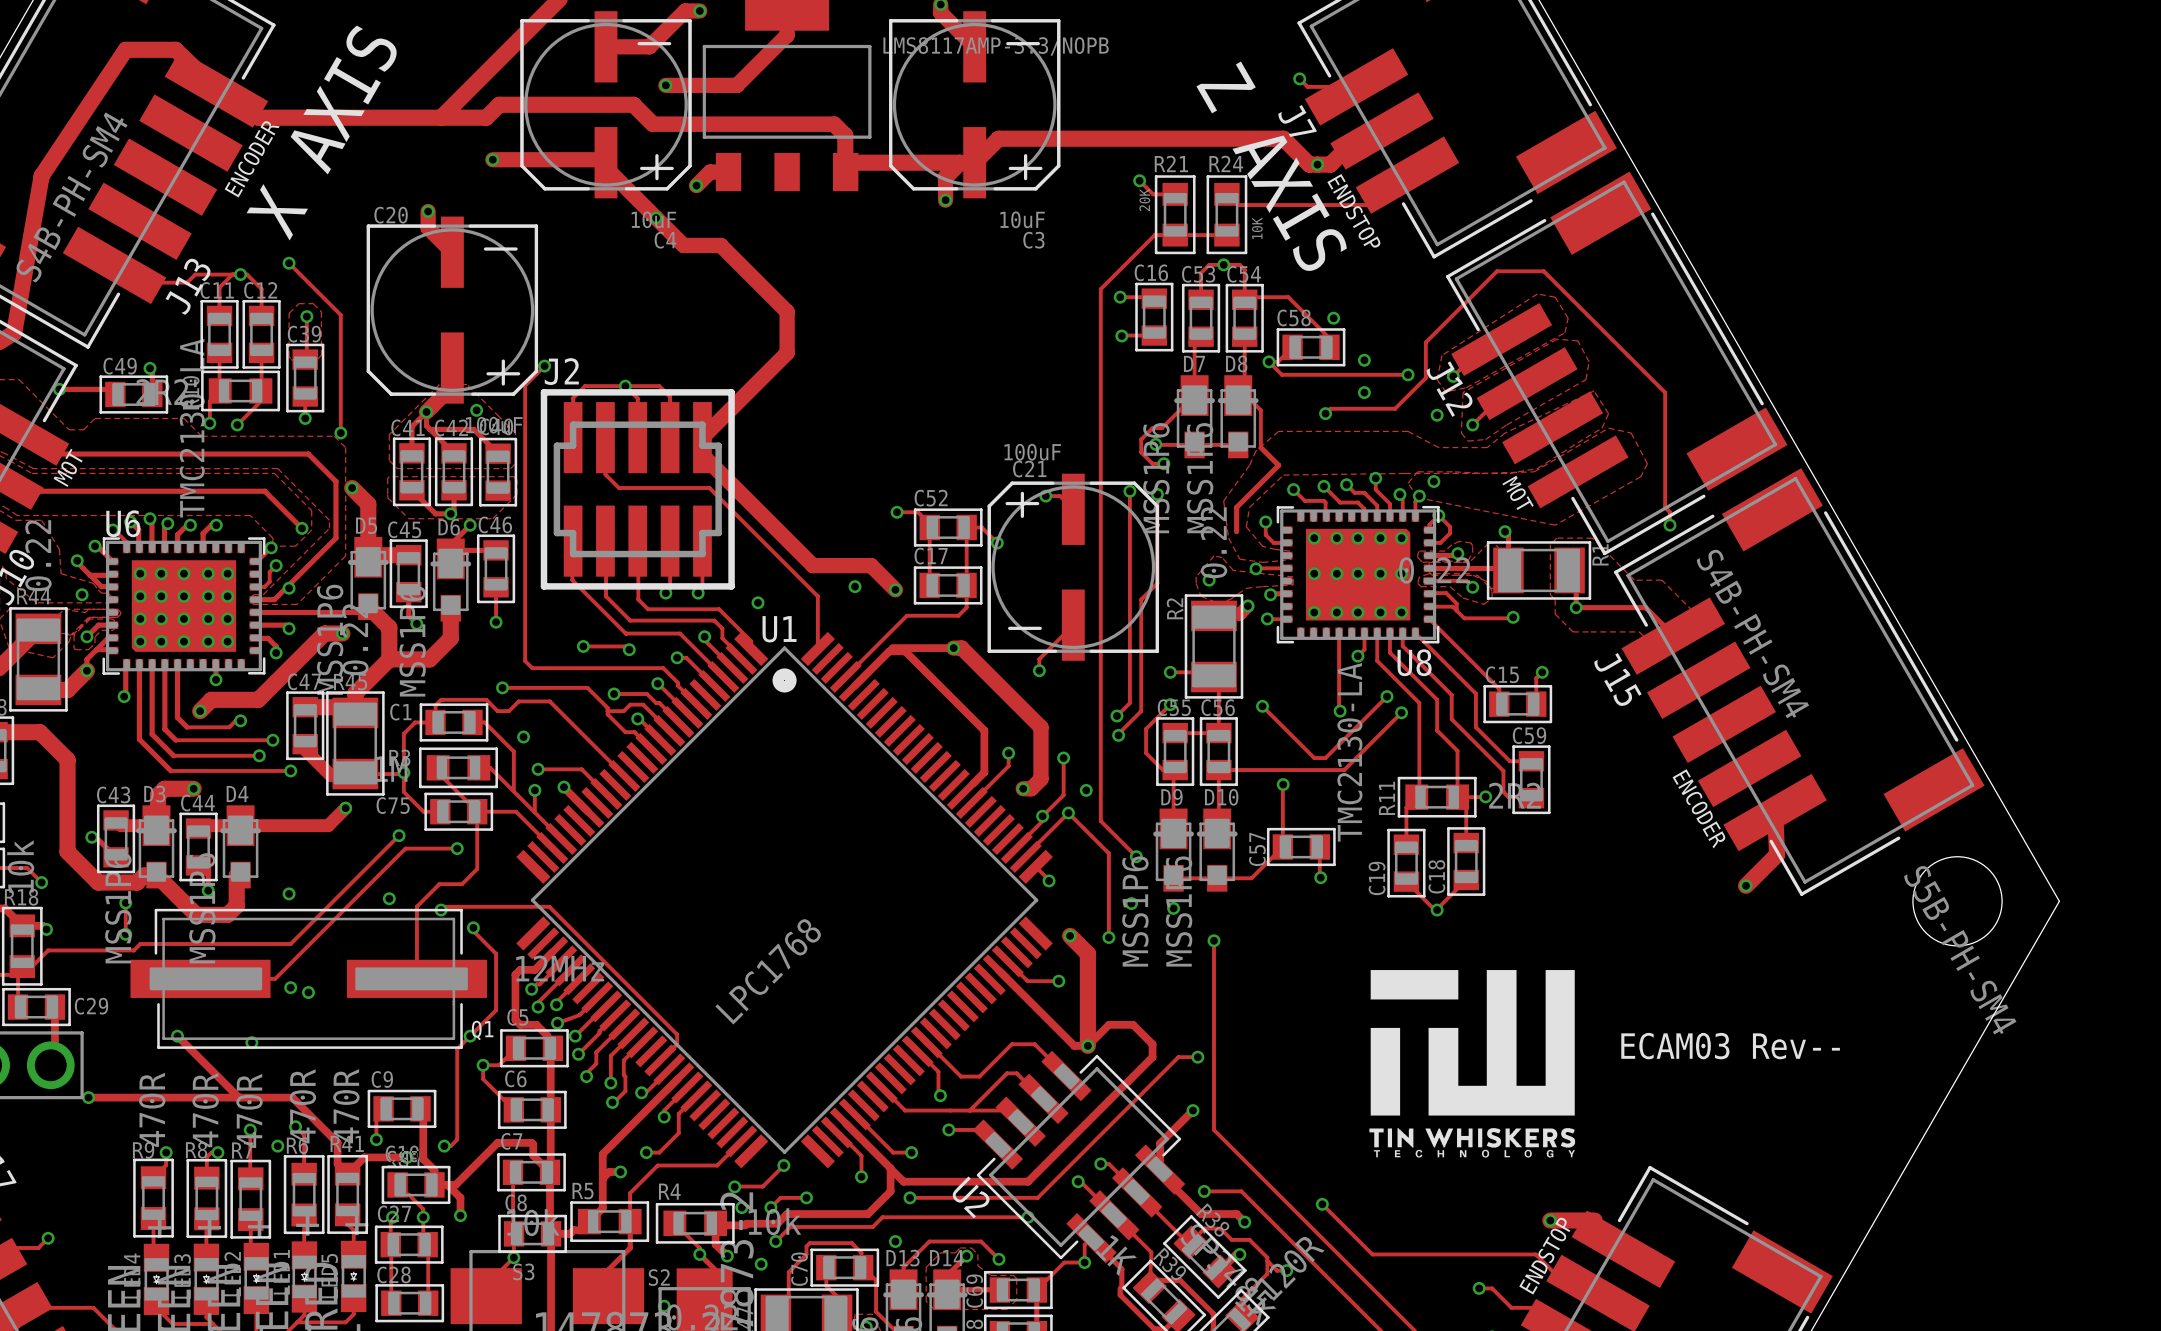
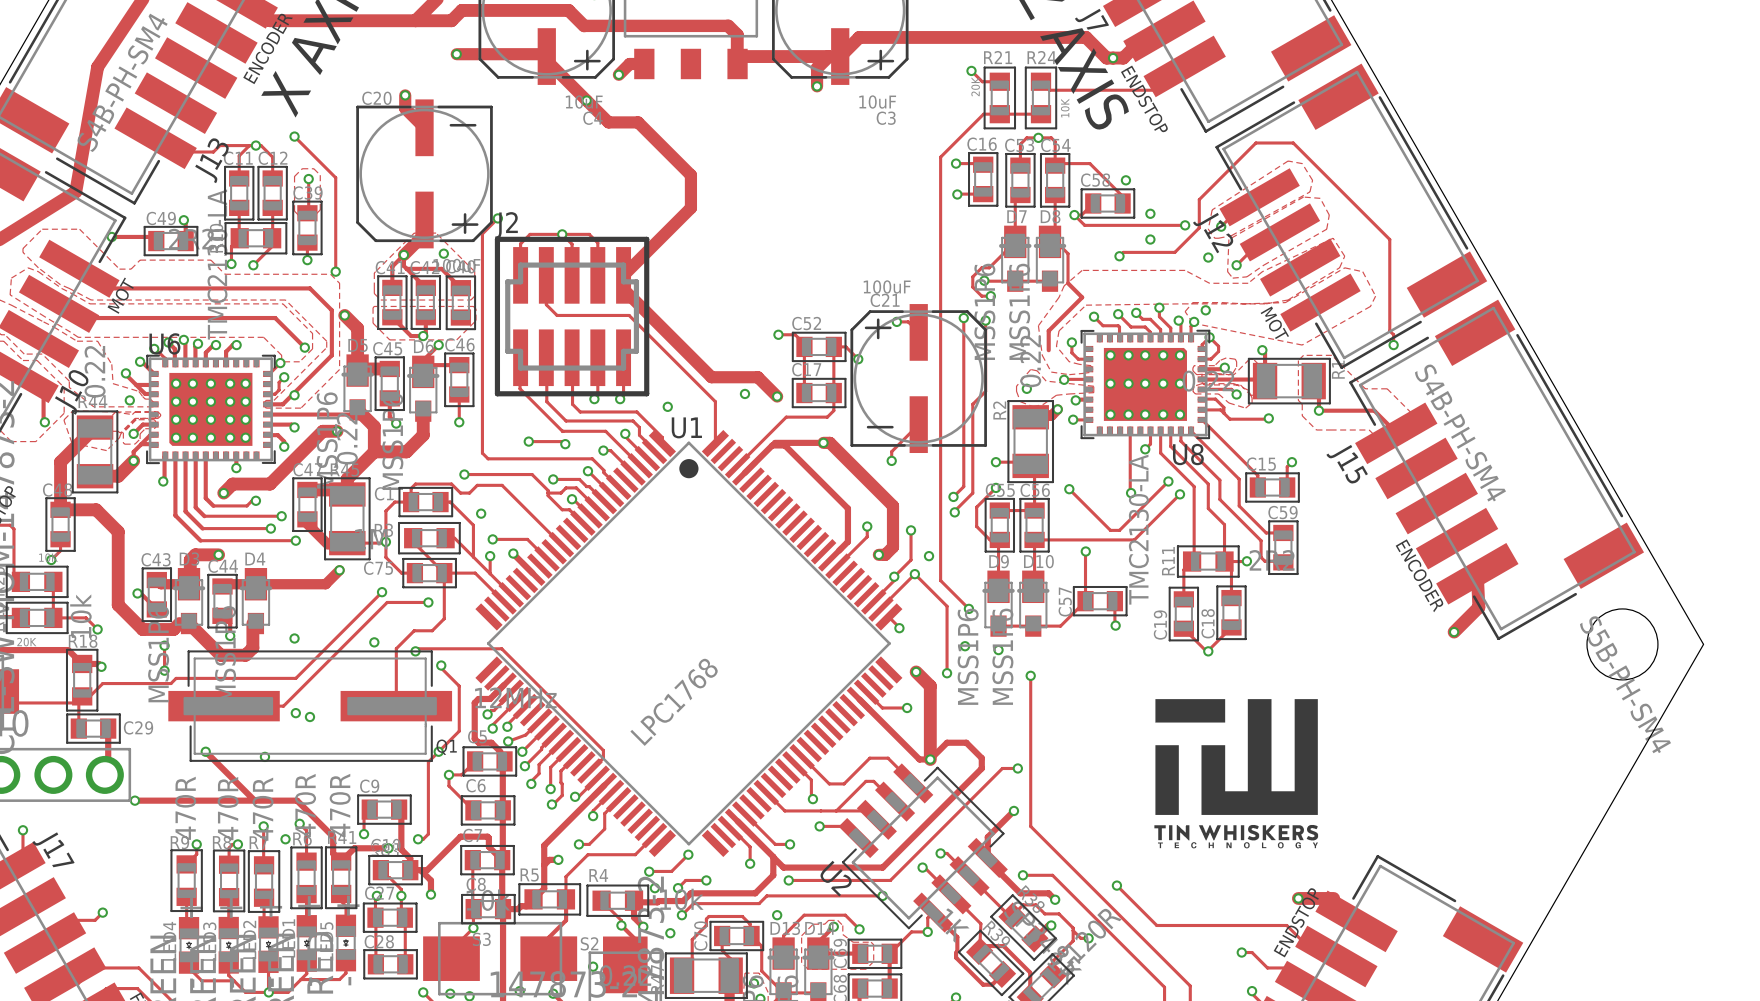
text: ECAM03 Rev-- (1730, 1046) -> none

